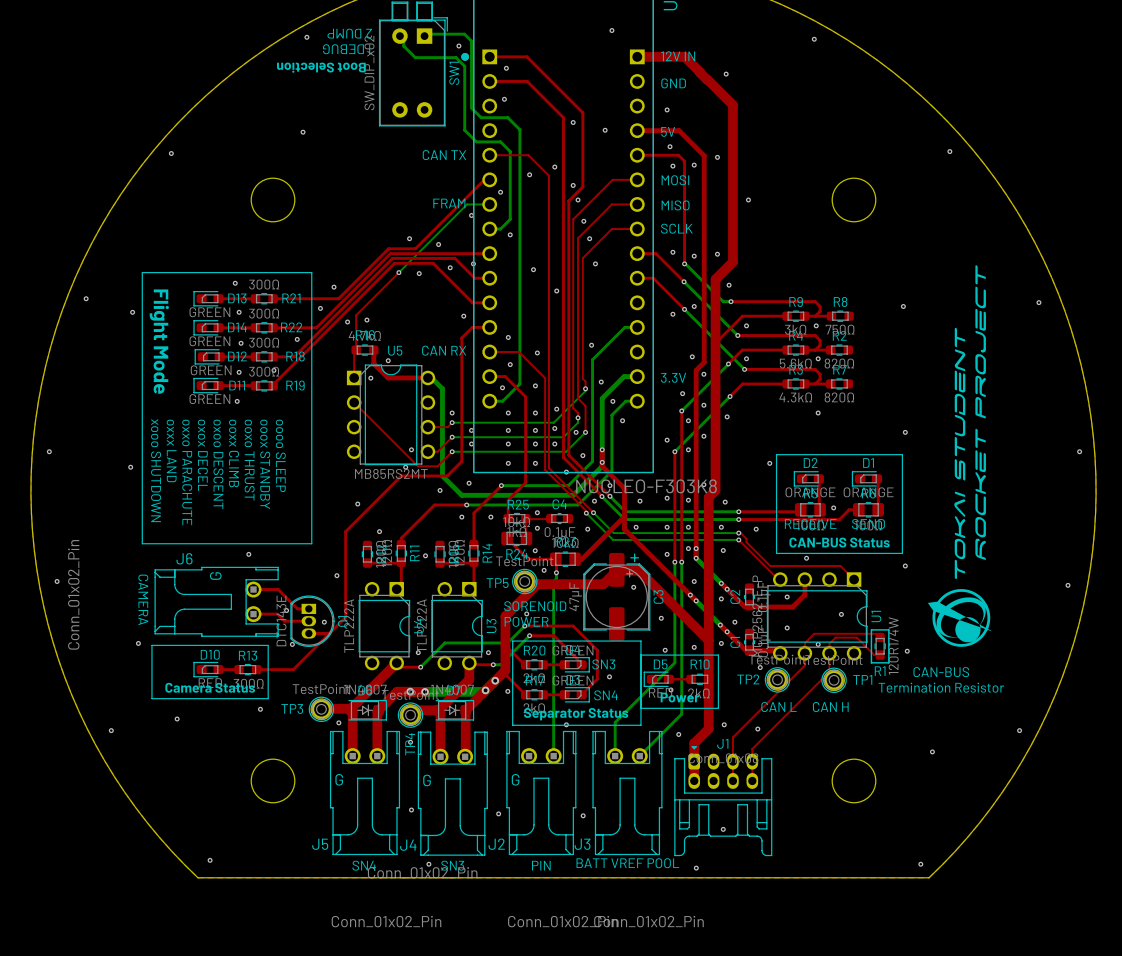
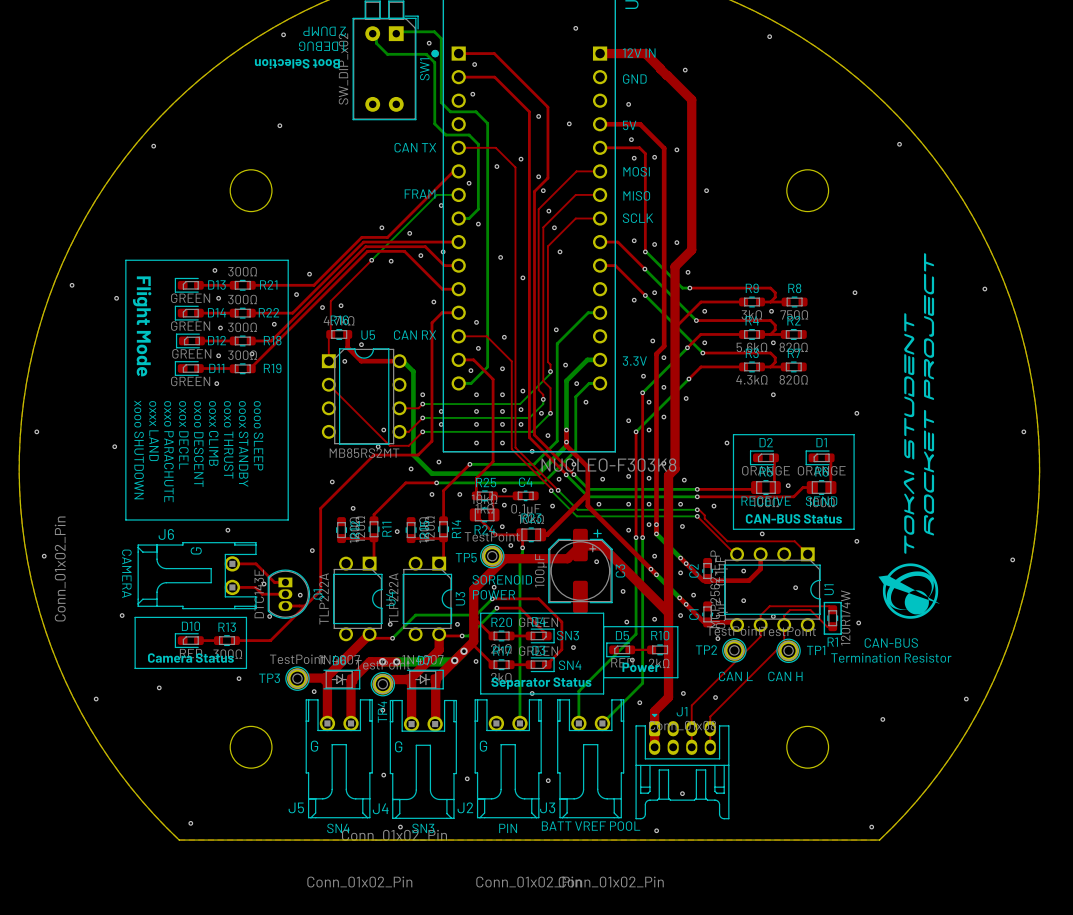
C3 value: 47μF (575, 596) -> 100μF (540, 570)

